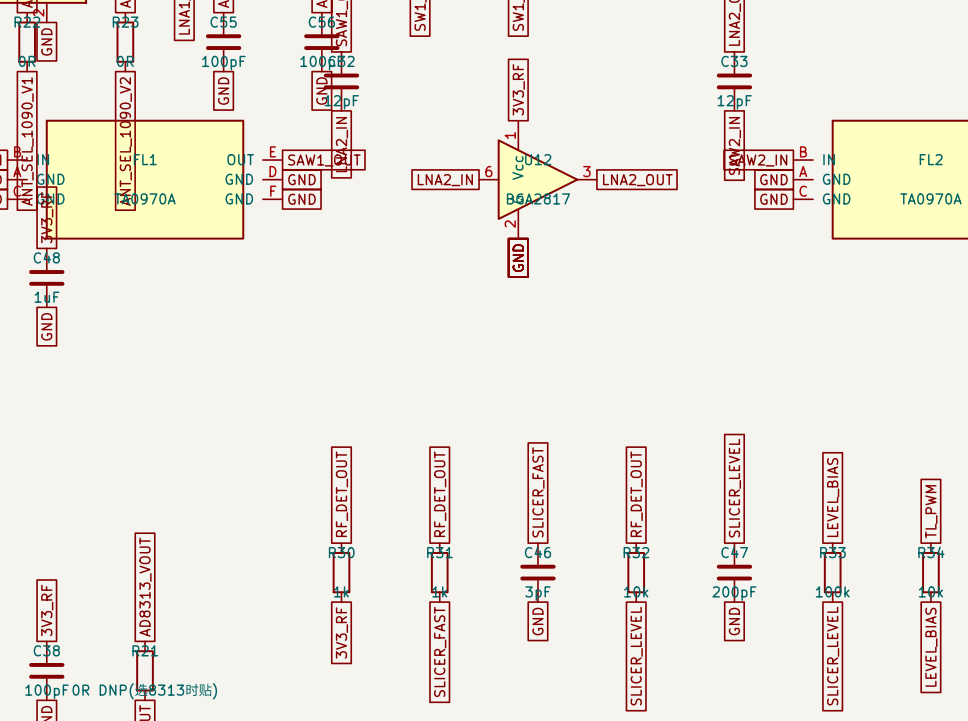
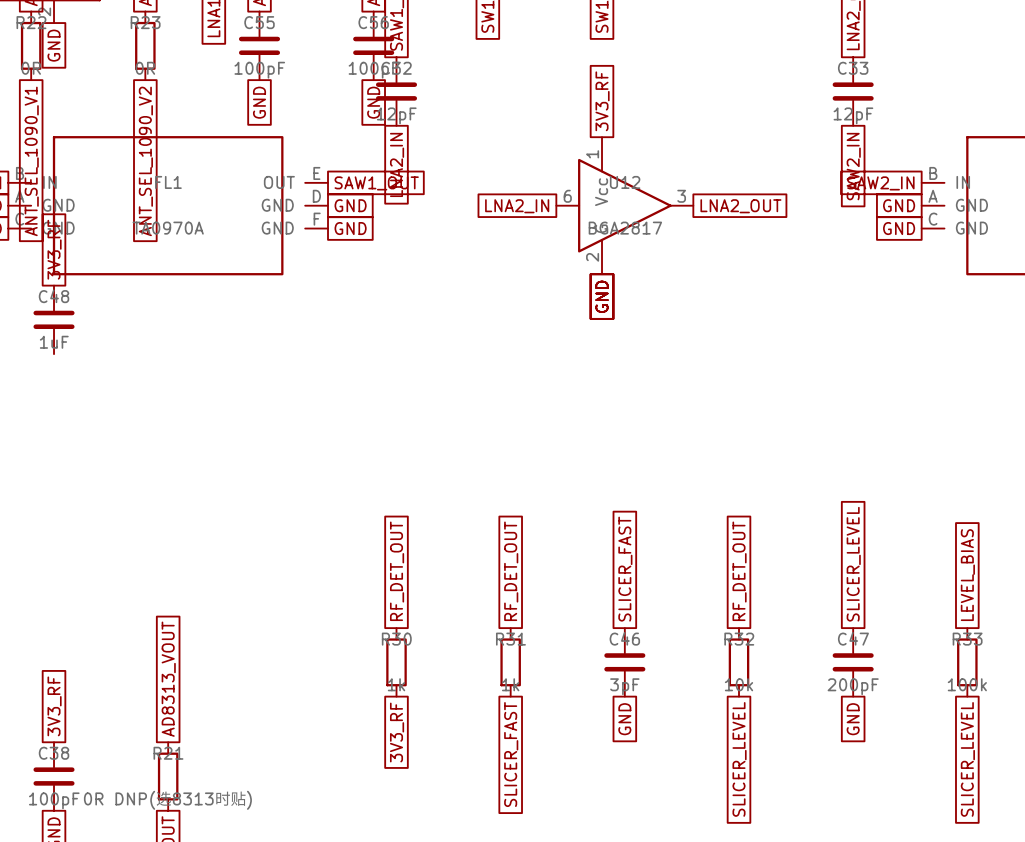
global label: GND (46, 326) -> none

